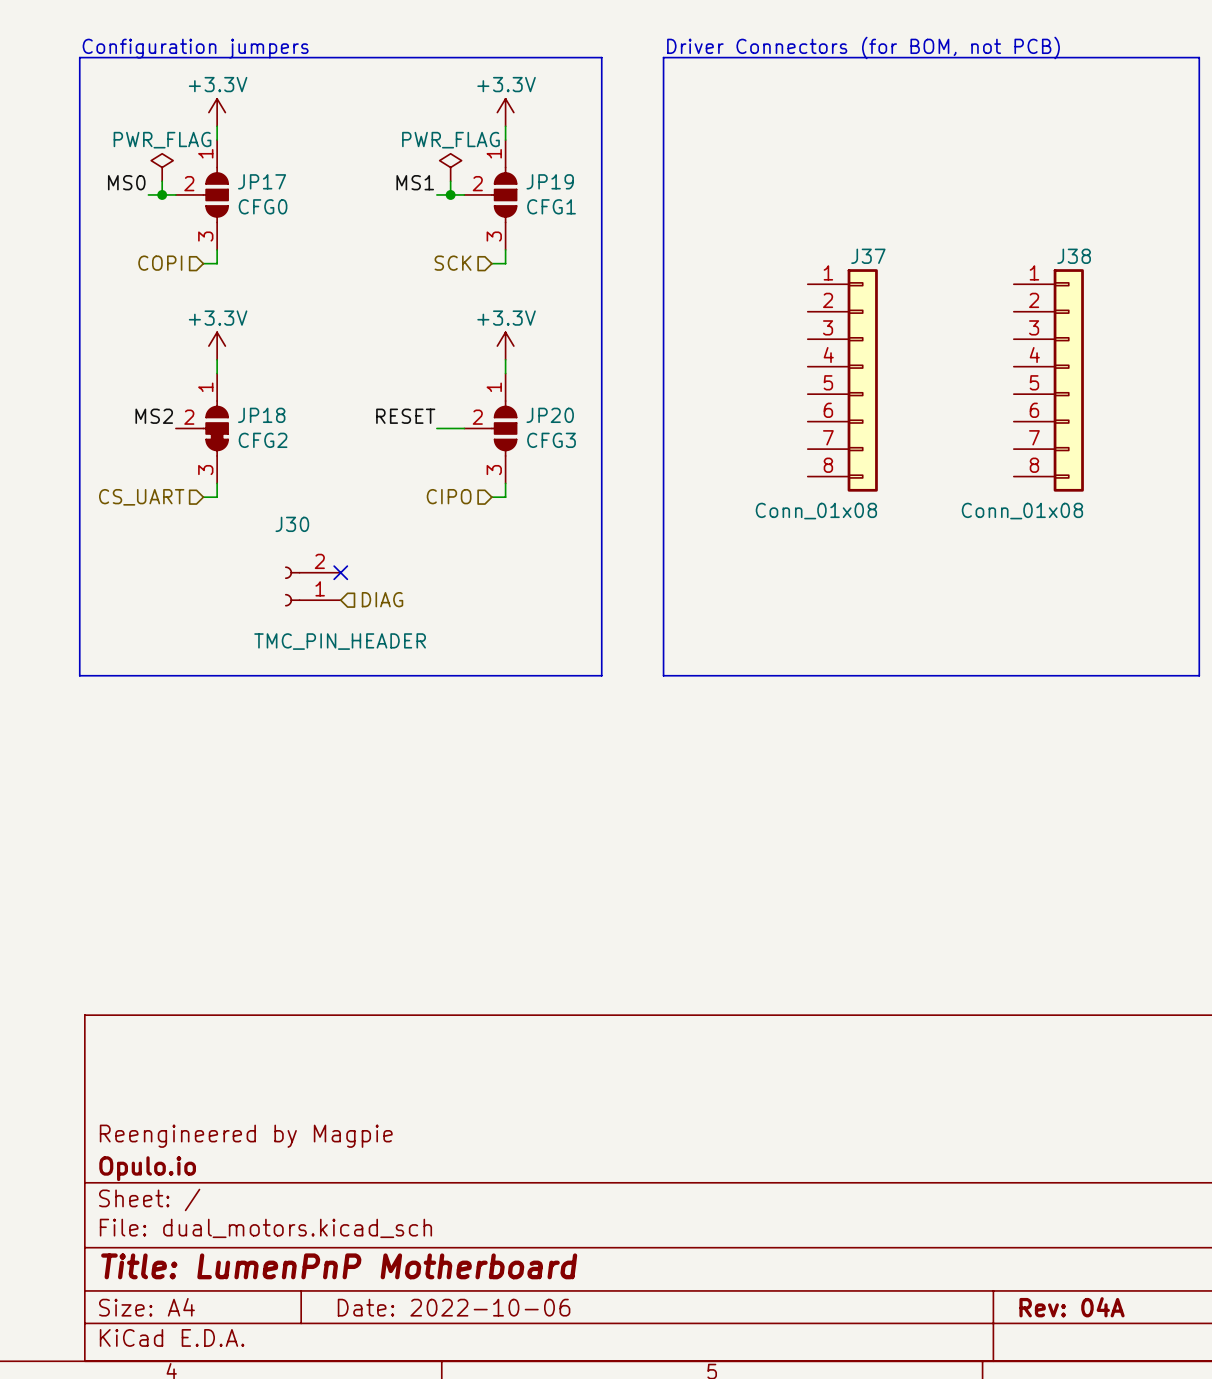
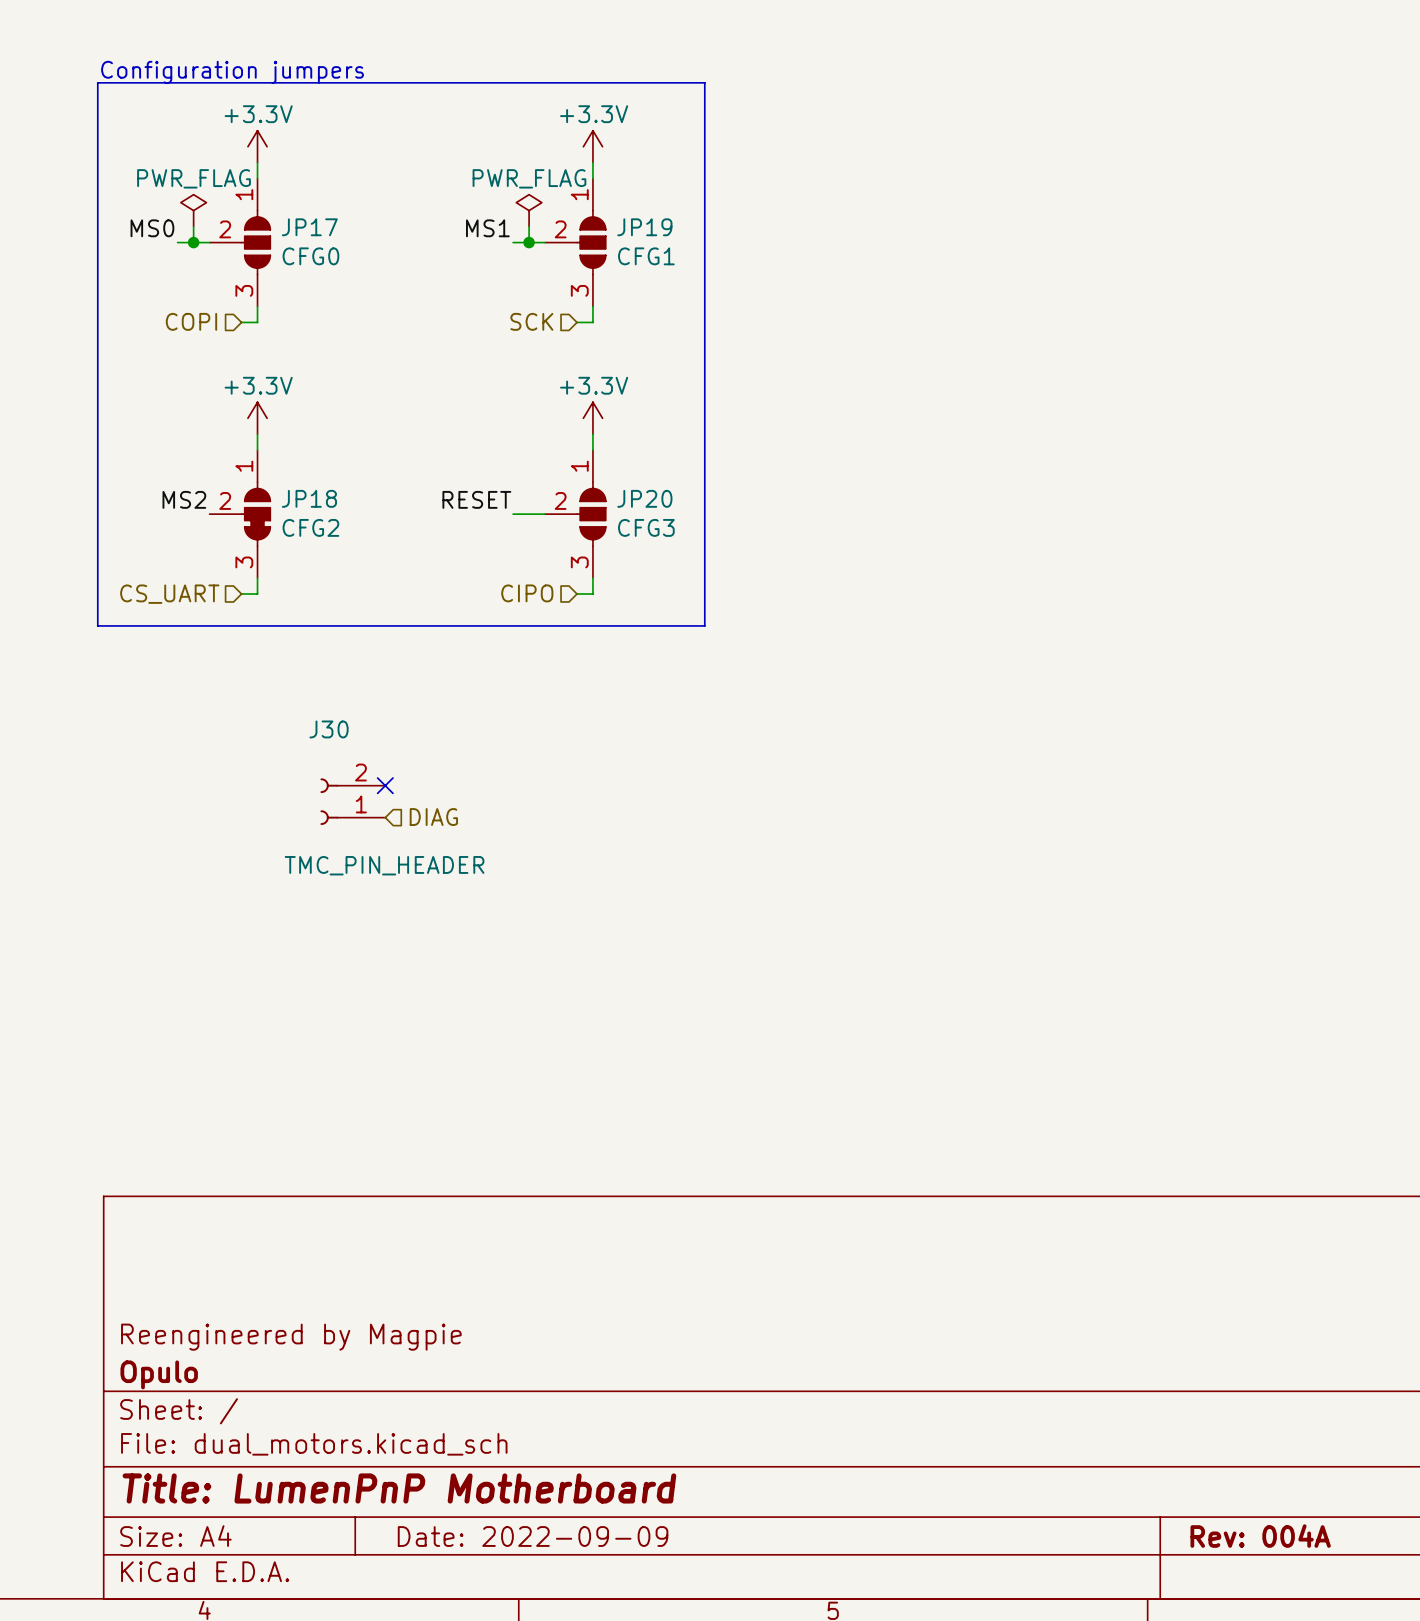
text: Driver Connectors (for BOM, not PCB) (863, 47) -> none
line: (663, 57) (663, 675) (1199, 675) (1199, 57) (663, 57) -> none
J37: Conn_01x08 (842, 380) -> none
J38: Conn_01x08 (1048, 380) -> none
line: (79, 524) (79, 675) (601, 675) (601, 524) -> (97, 625) (704, 625)
no-connect mark: (340, 572) -> none
J30 position: (312, 586) -> (352, 801)
hierarchical label position: DIAG (382, 599) -> DIAG (433, 817)
no-connect mark: none -> (385, 785)
title block: Opulo.io (147, 1168) -> Opulo (159, 1374)
title block: Date: 2022-10-06 (454, 1307) -> Date: 2022-09-09 (533, 1536)
title block: Rev: 04A (1072, 1307) -> Rev: 004A (1260, 1536)

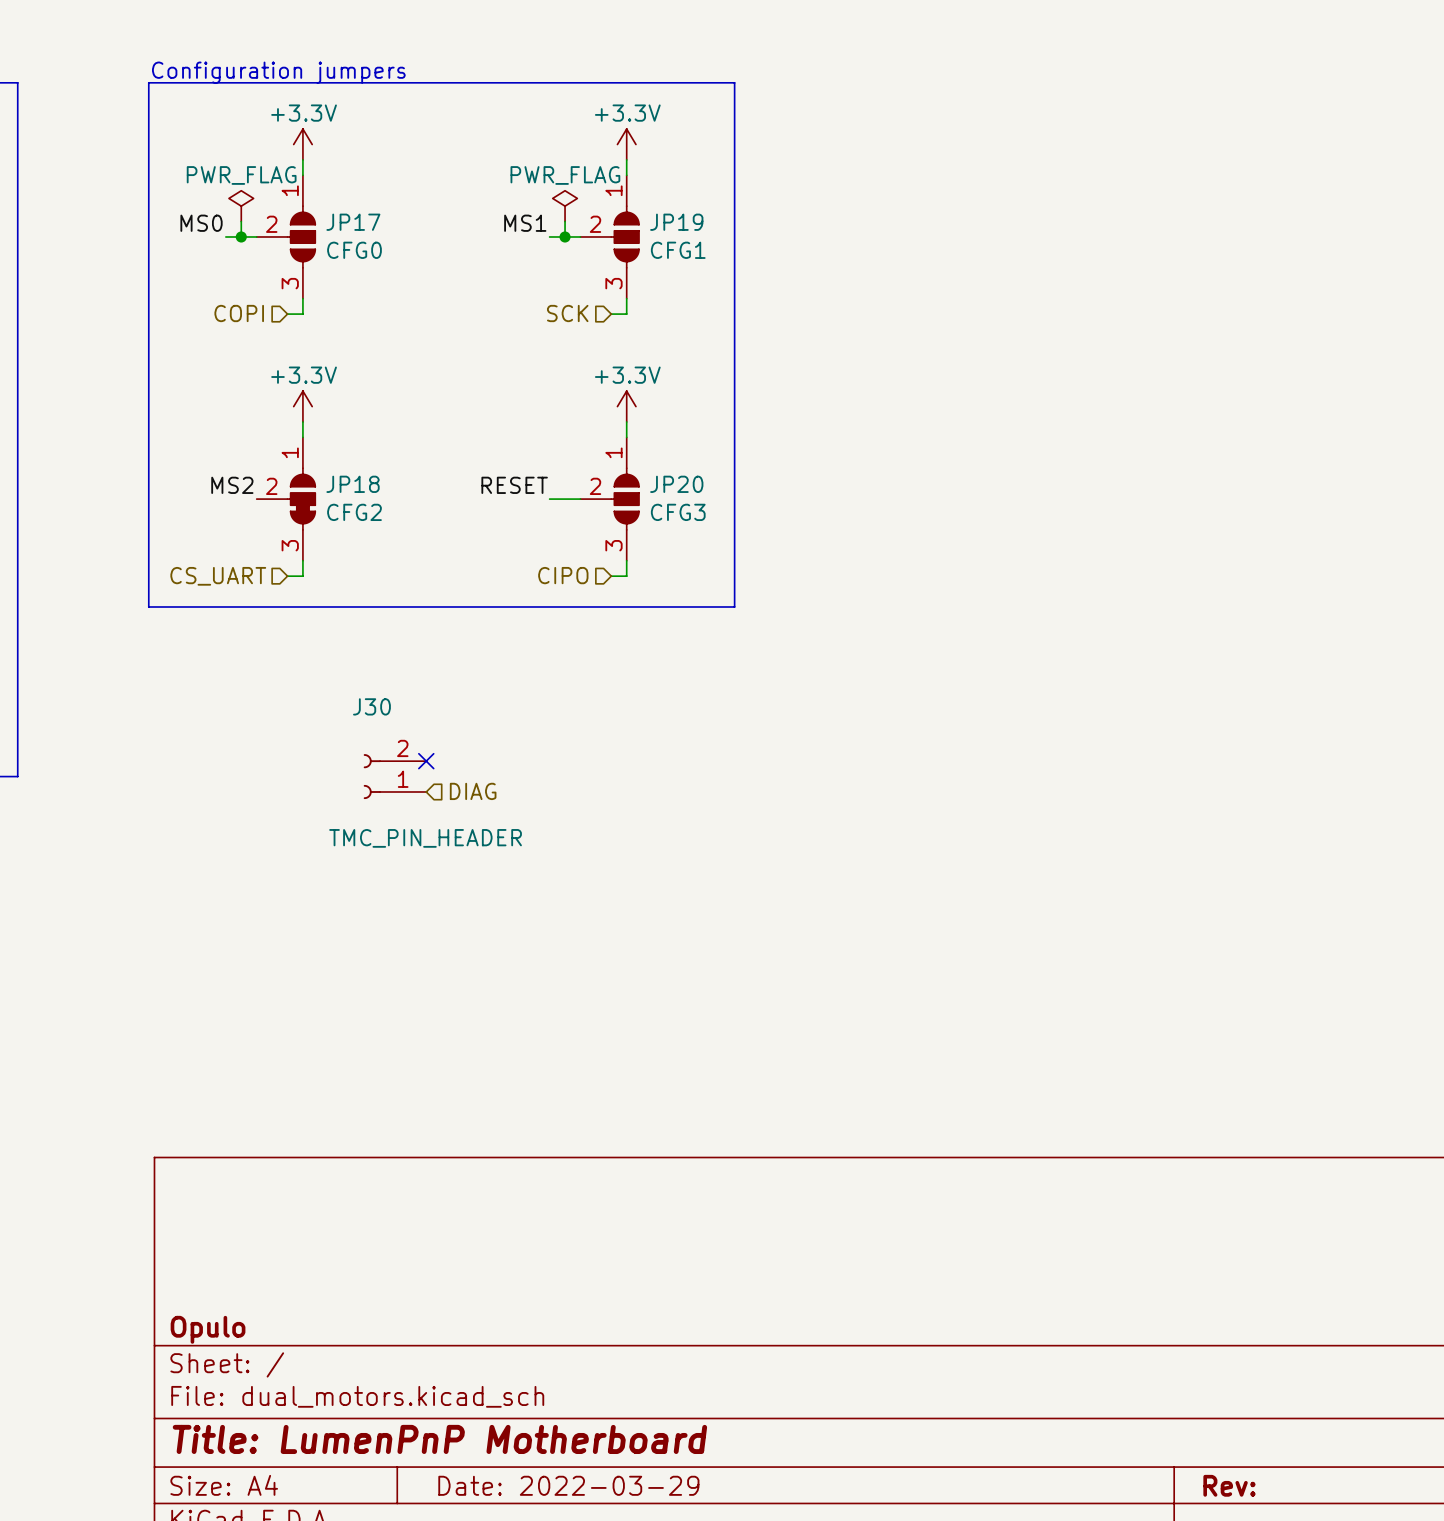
title block: Reengineered by Magpie (291, 1337) -> none
title block: Date: 2022-09-09 (533, 1536) -> Date: 2022-03-29 (568, 1485)
title block: Rev: 004A (1260, 1536) -> Rev: (1229, 1485)

